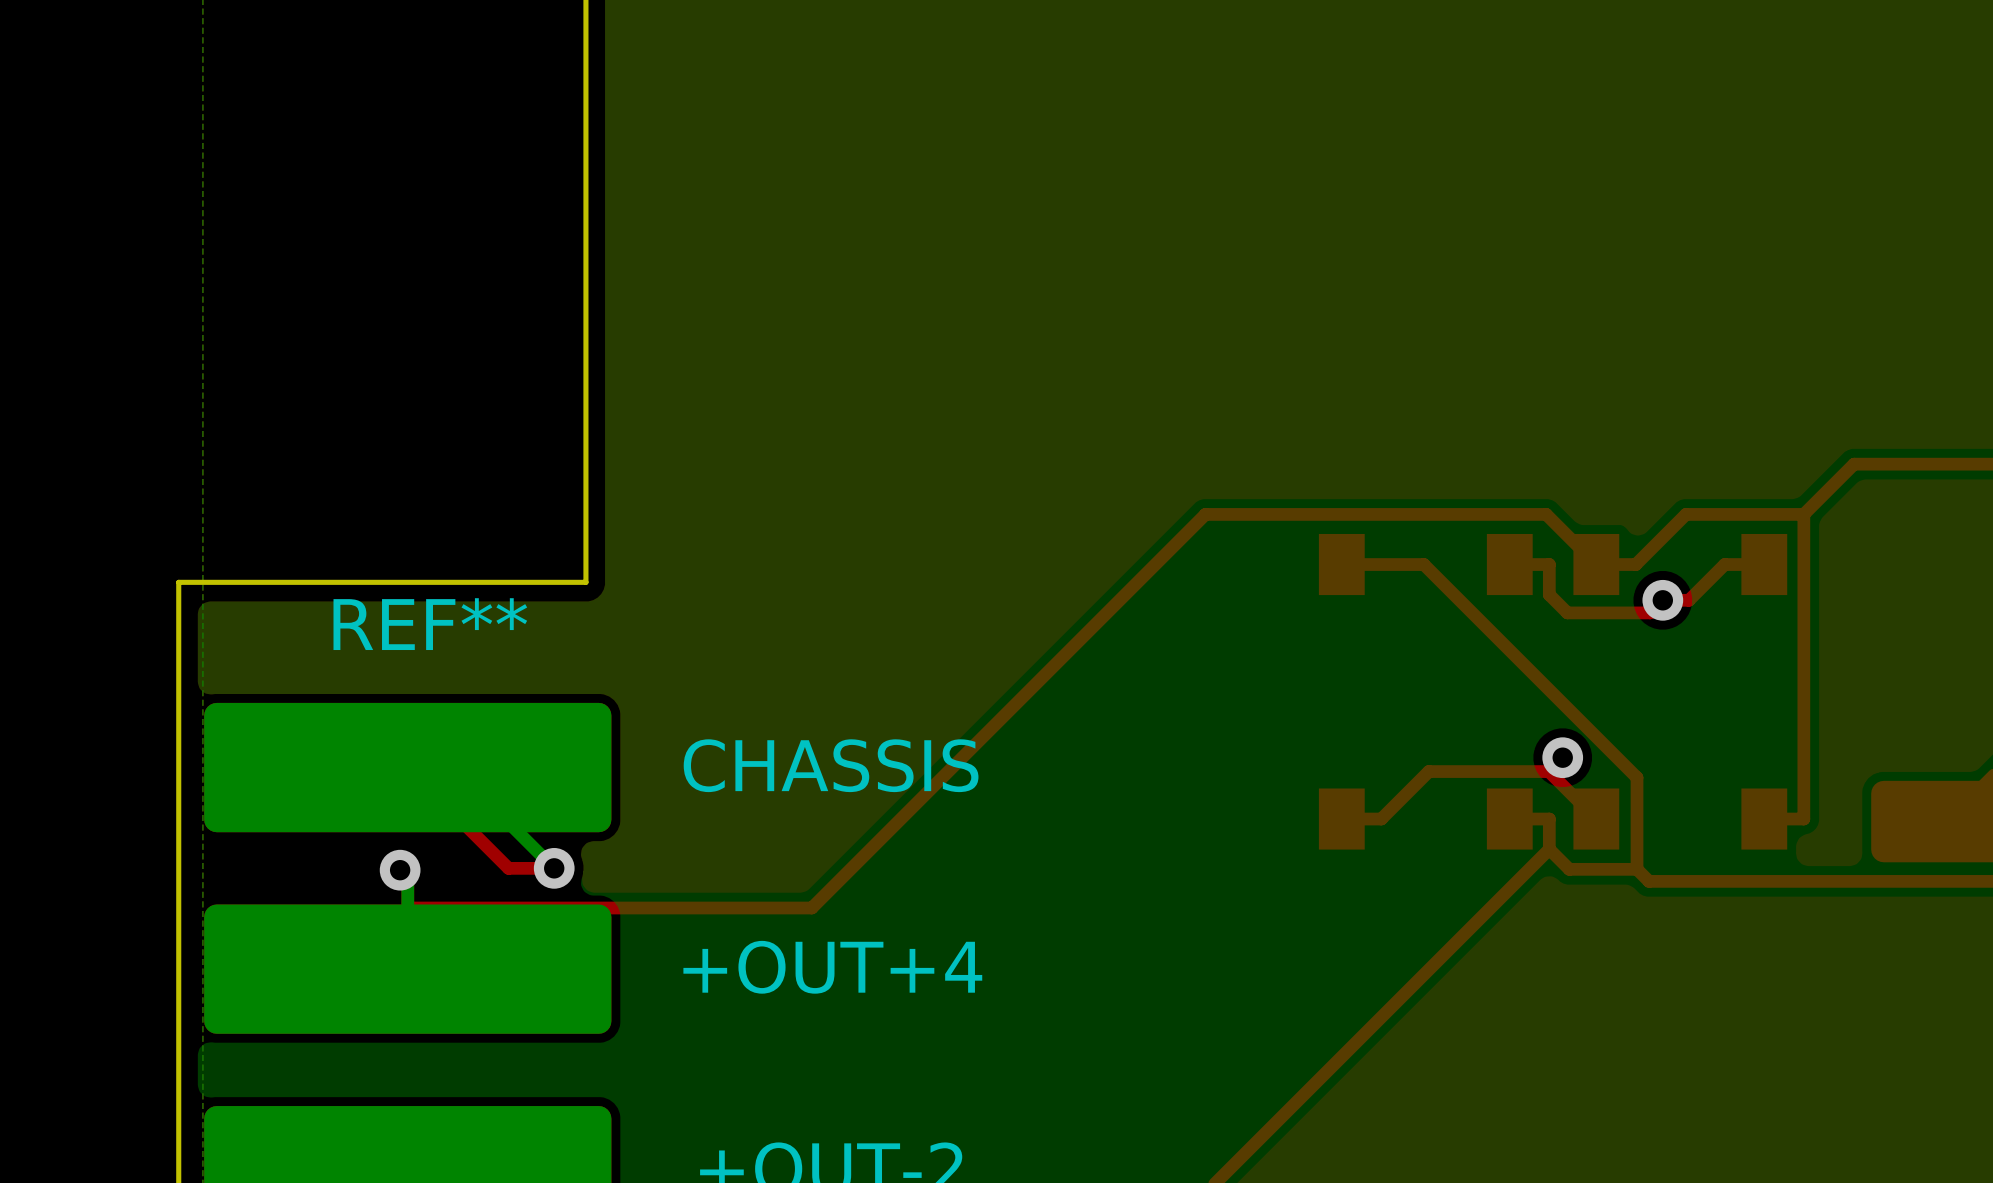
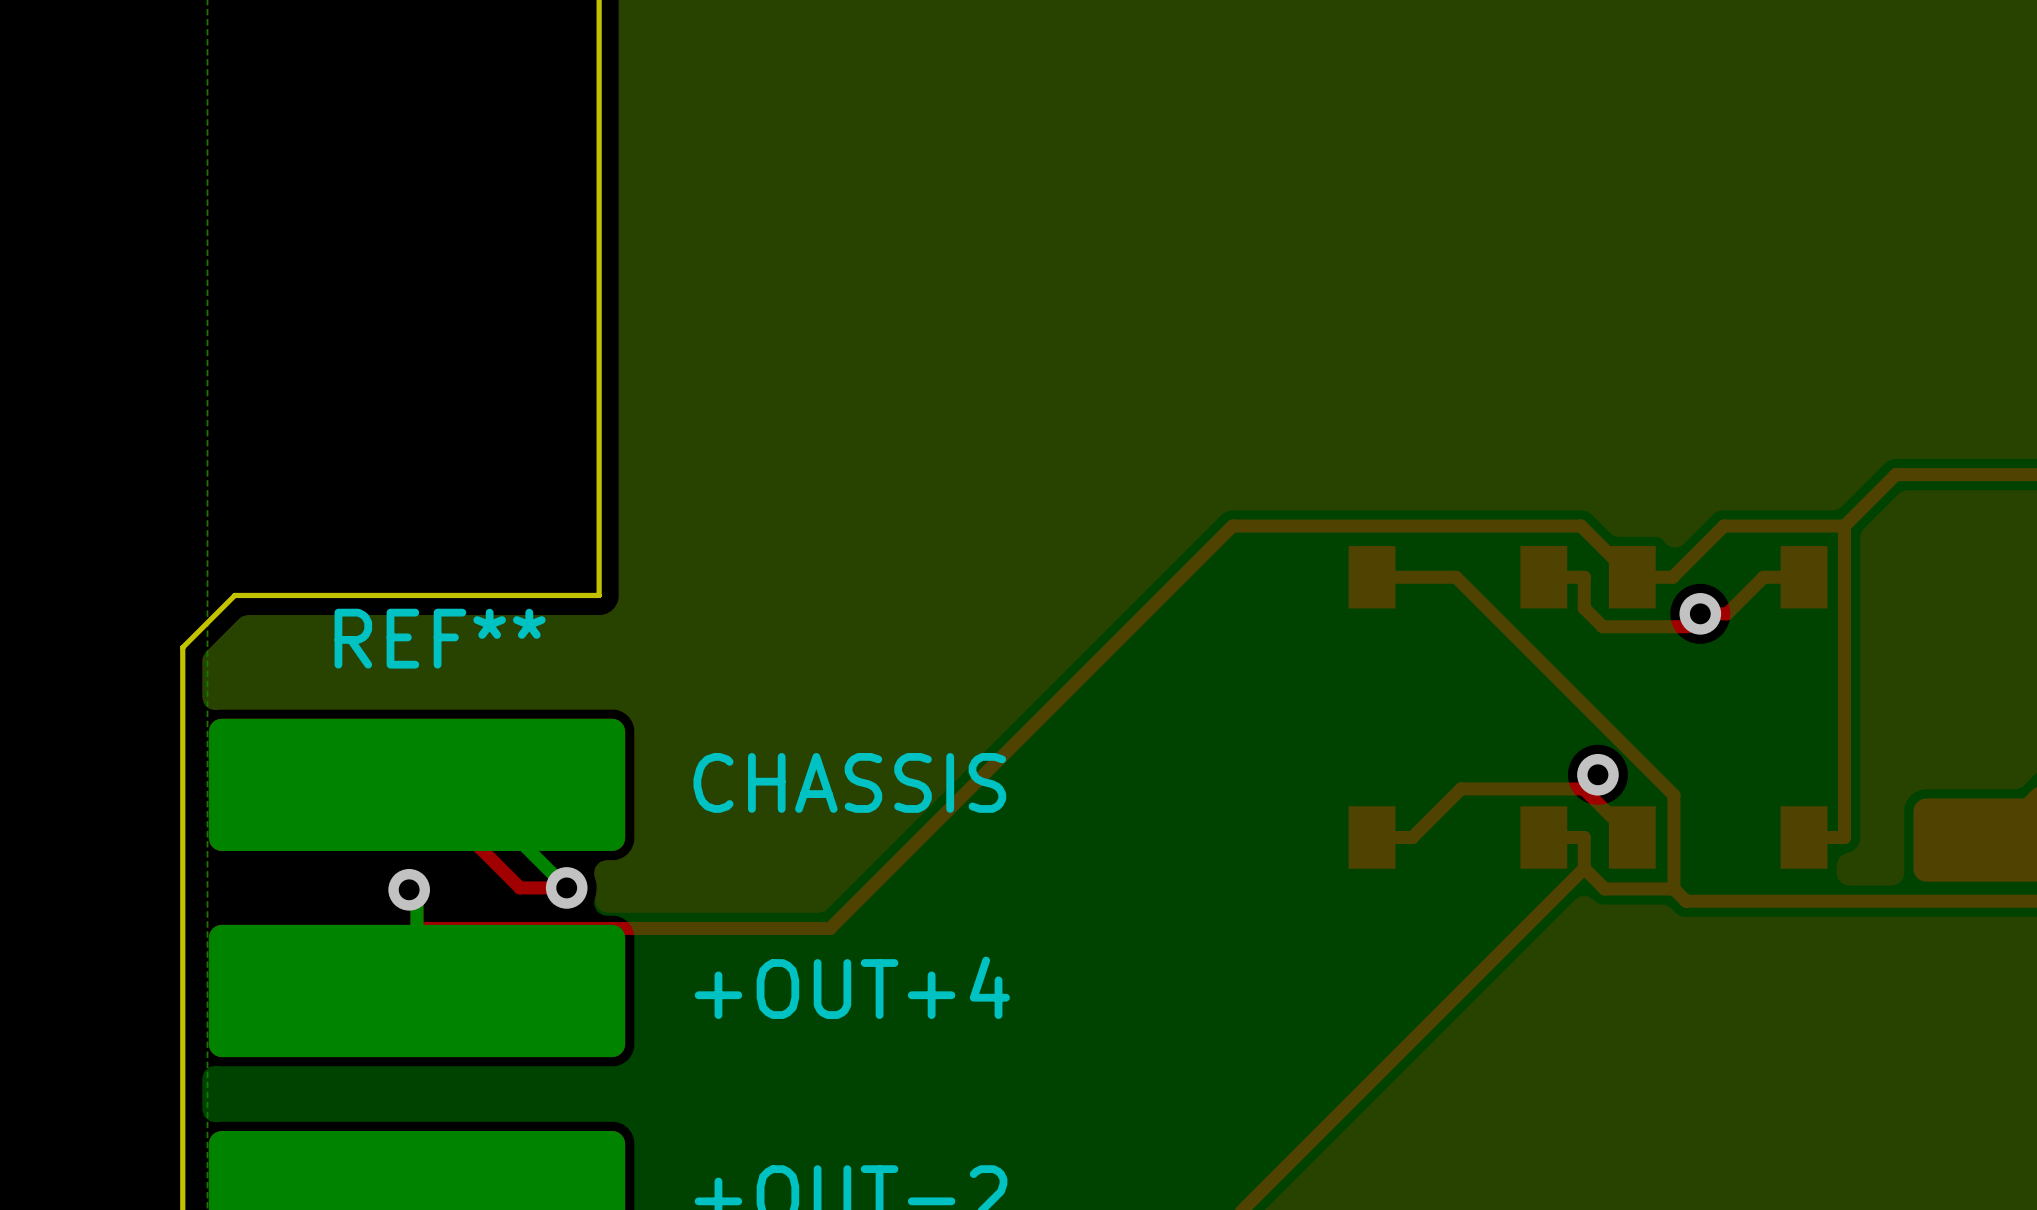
board edge: (229, 582) (178, 582) (178, 633) -> (234, 595) (182, 647)

